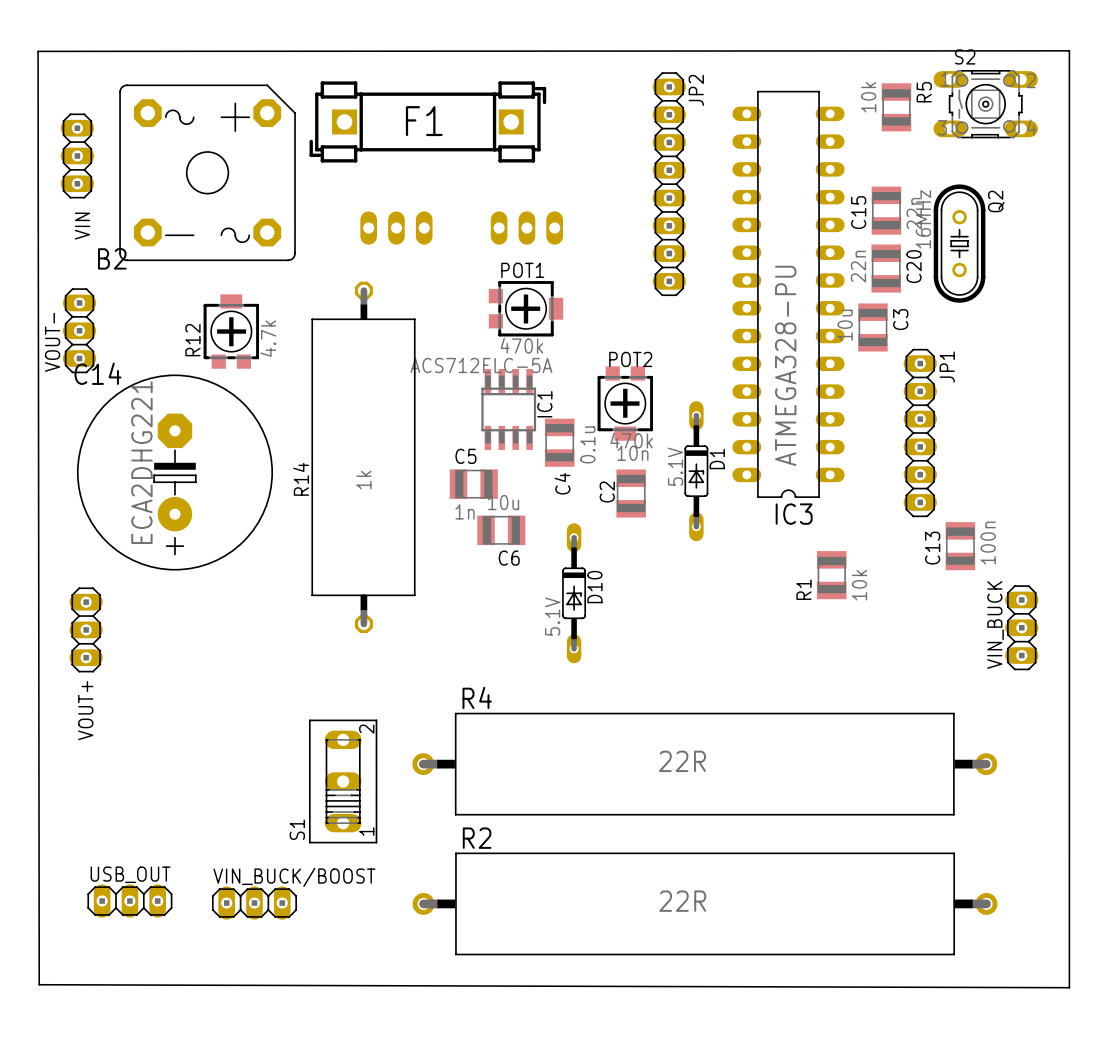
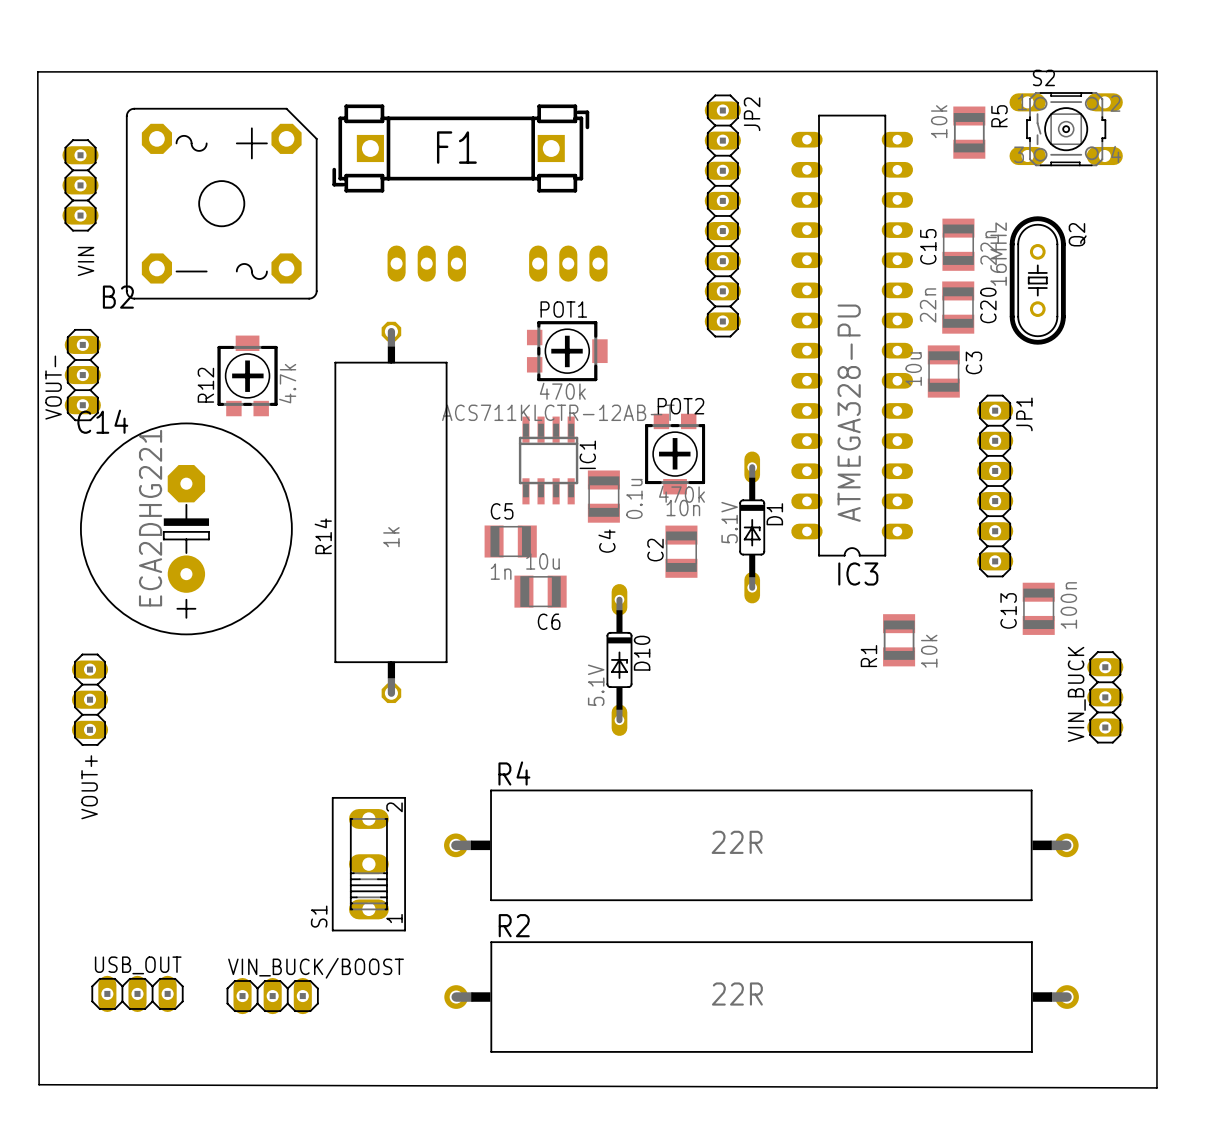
IC1 value: ACS712ELC-5A (481, 365) -> ACS711KLCTR-12AB-T (558, 412)

